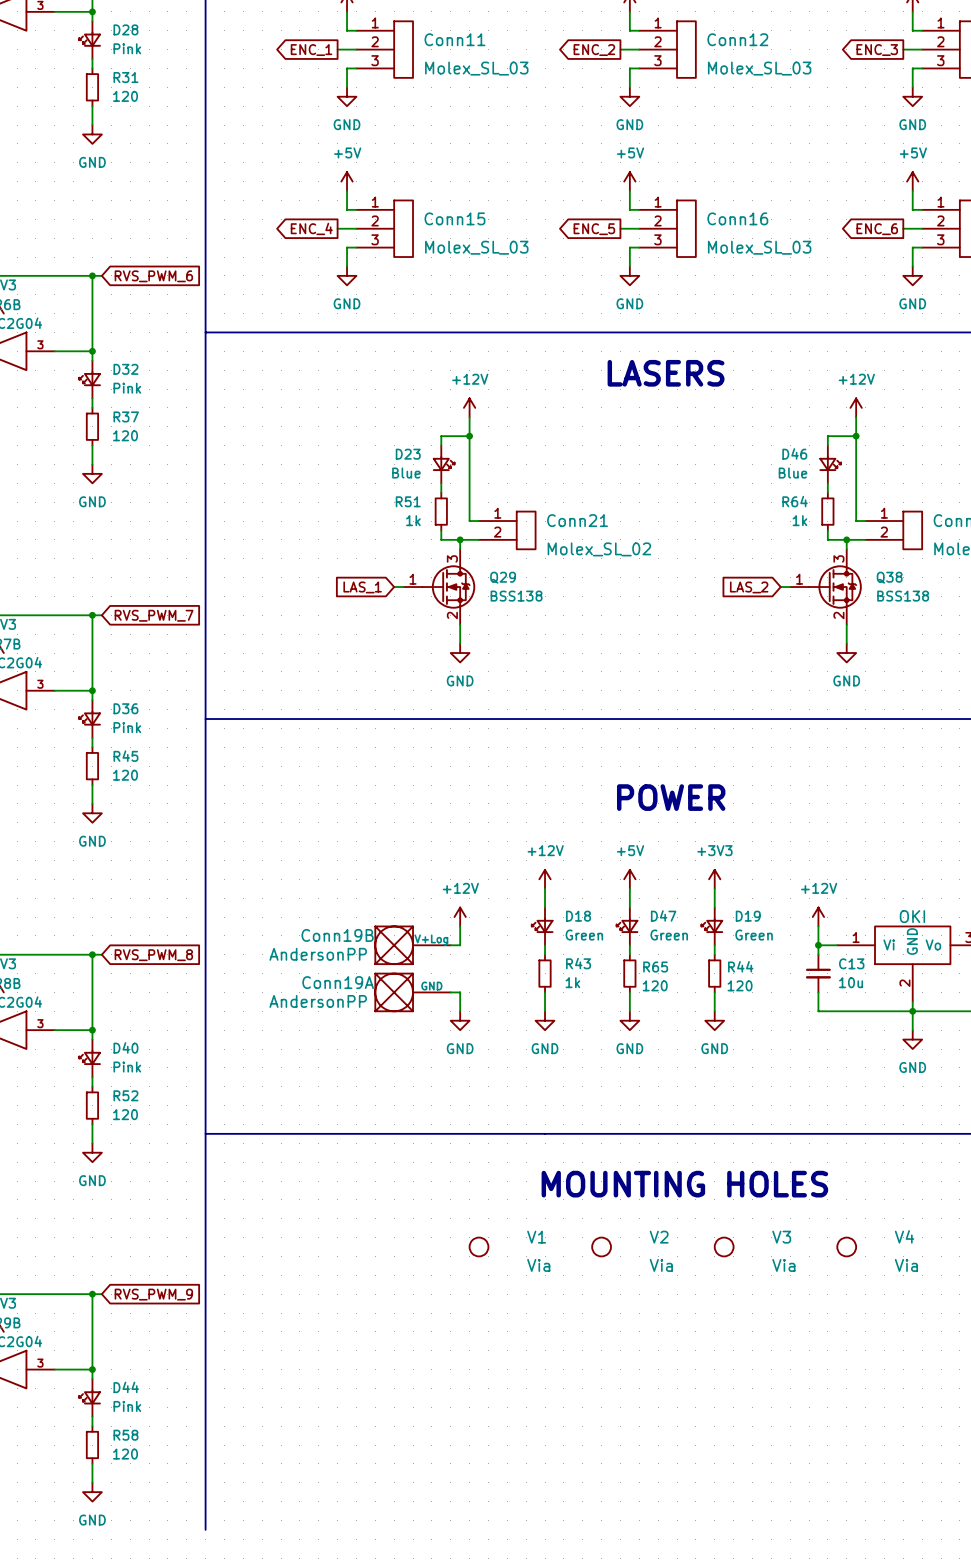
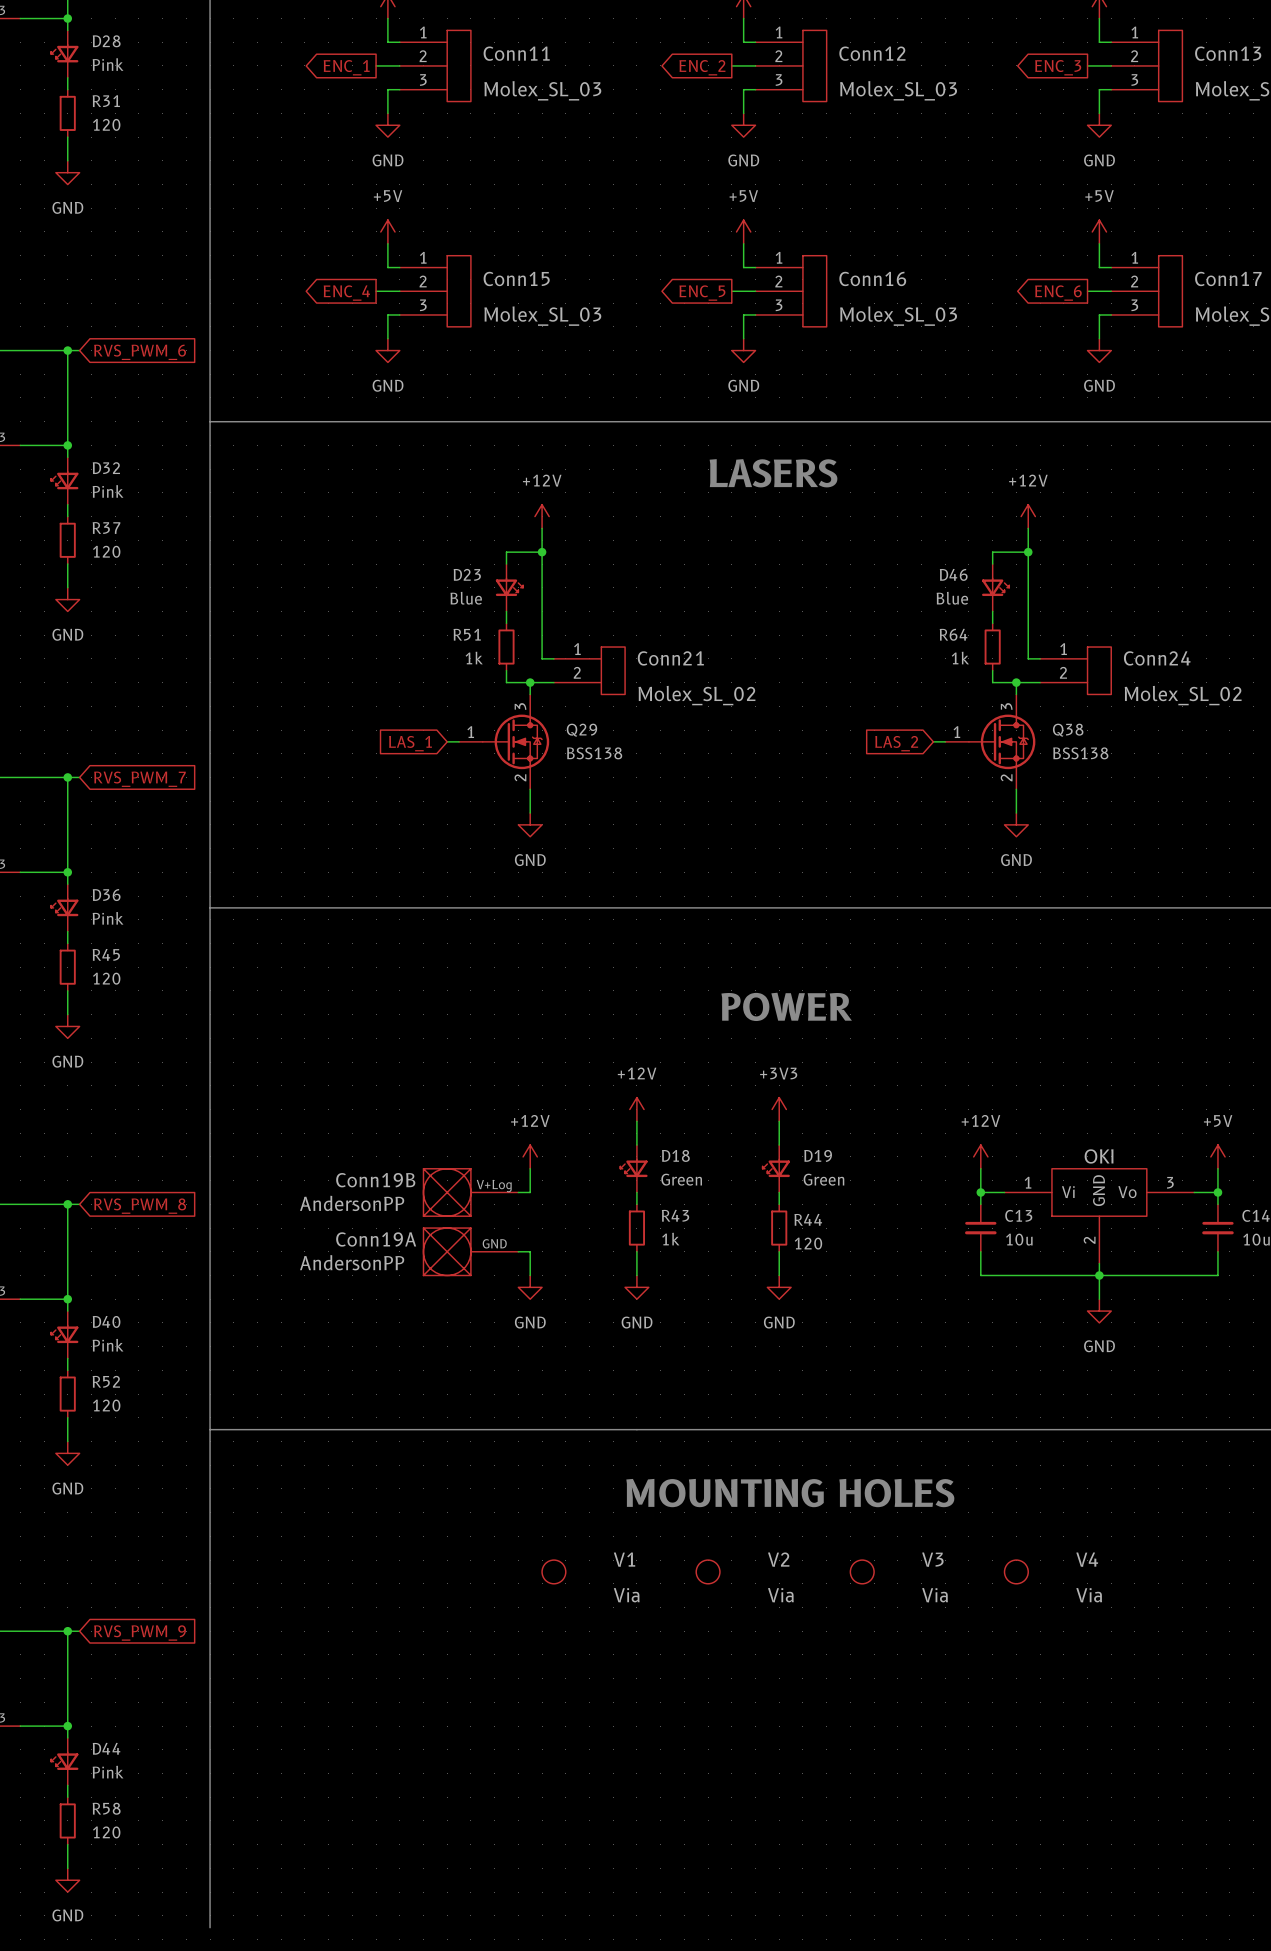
power symbol: +5V (629, 879) -> none
power symbol position: +3V3 (714, 879) -> +3V3 (779, 1109)
wire: (629, 888) (629, 907) -> (779, 1121) (779, 1145)
wire: (714, 888) (714, 907) -> none
D47: Green (627, 926) -> none
D19 position: (712, 926) -> (776, 1168)
wire: (629, 945) (629, 954) -> (779, 1192) (779, 1204)
wire: (714, 945) (714, 954) -> none
R65: 120 (629, 973) -> none
R44 position: (714, 973) -> (779, 1228)
wire: (629, 992) (629, 1011) -> (779, 1251) (779, 1275)
wire: (714, 992) (714, 1011) -> none
power symbol: GND (629, 1020) -> none
power symbol: none -> GND (779, 1287)
power symbol: GND (714, 1020) -> none

